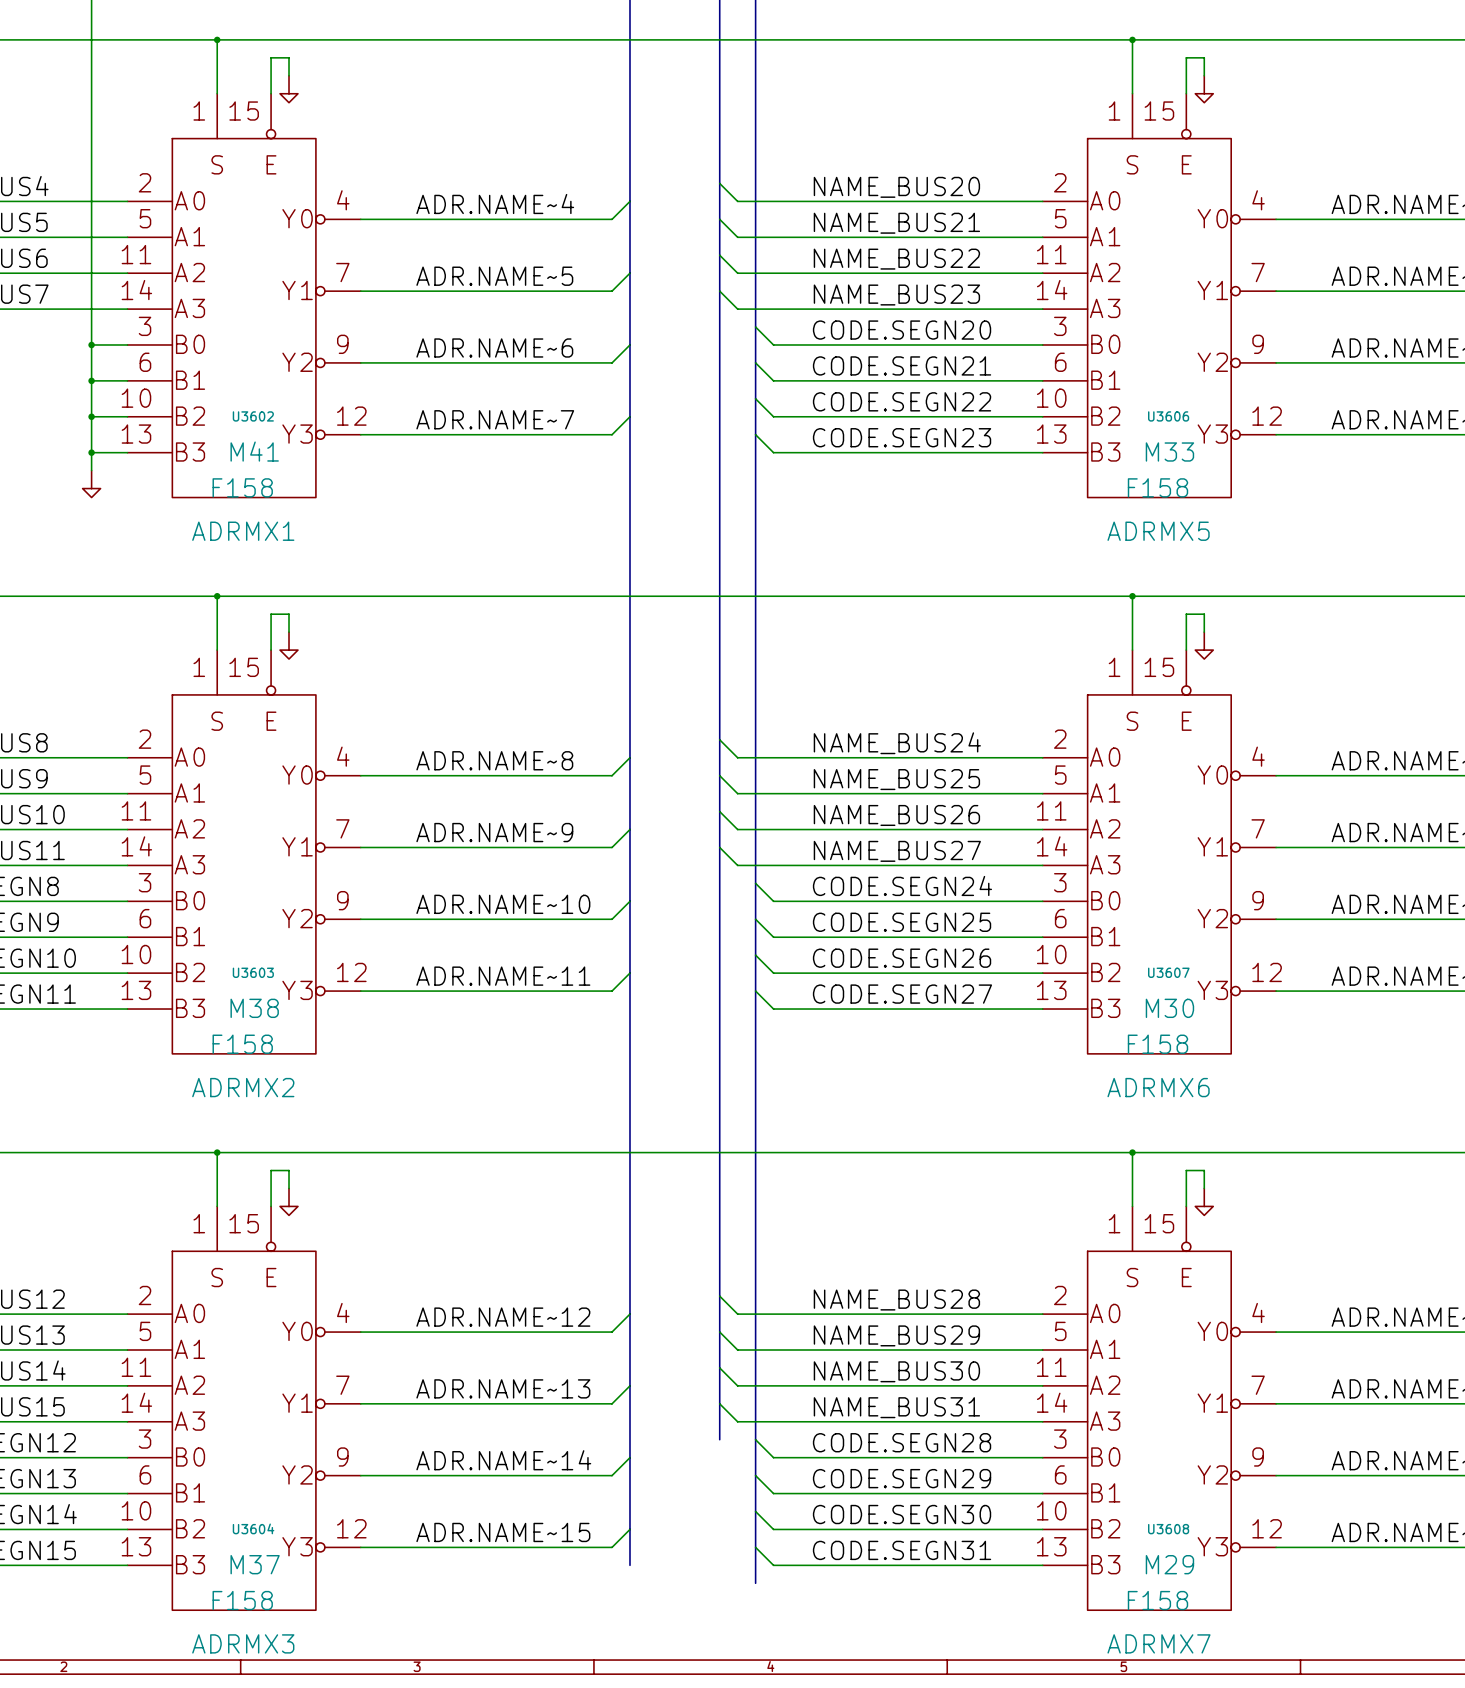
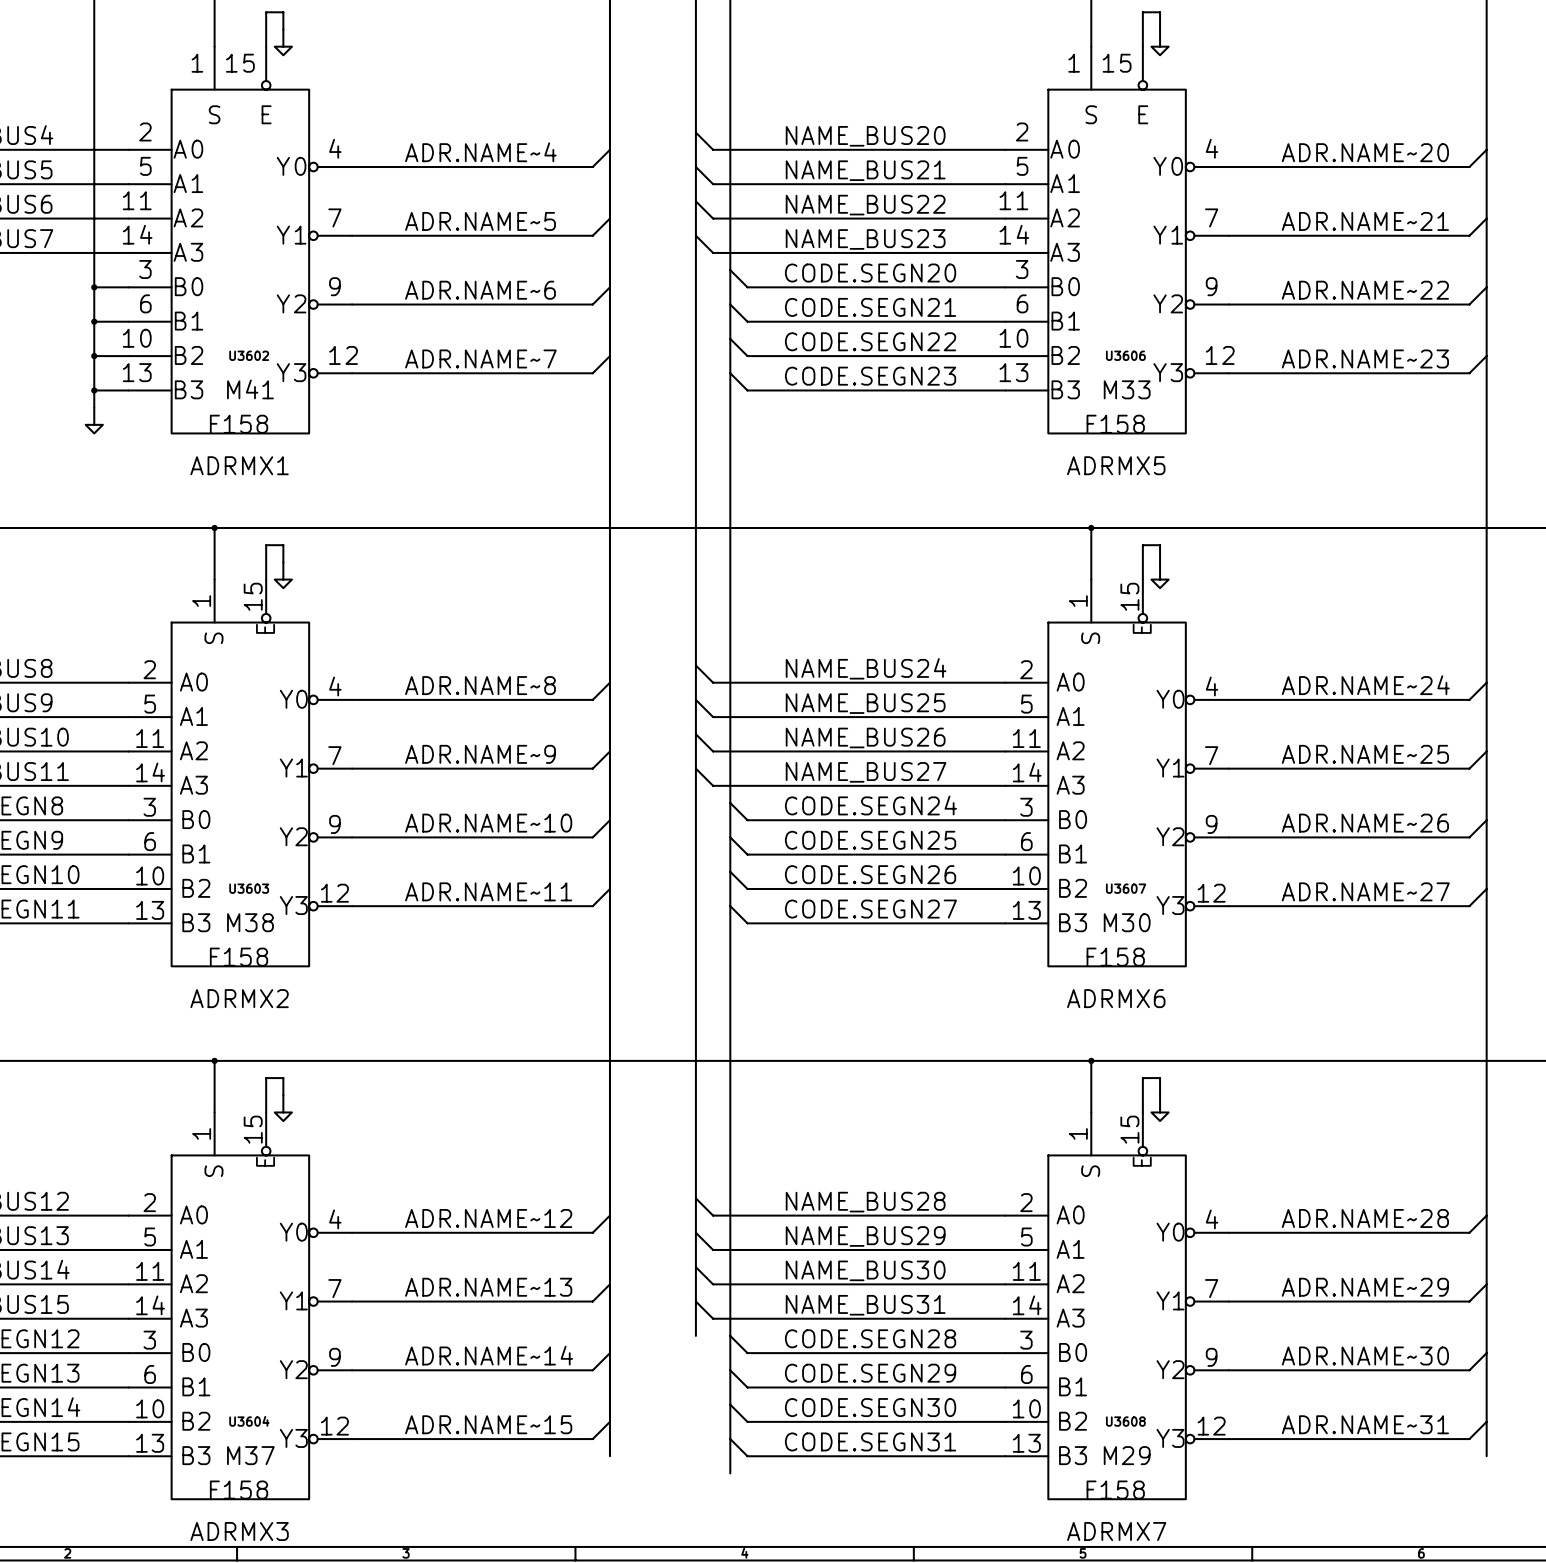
U3603 symbol: [127, 650, 361, 1054] -> [128, 579, 353, 967]
U3607 symbol: [1042, 650, 1277, 1054] -> [1005, 579, 1229, 967]
U3604 symbol: [127, 1206, 361, 1611] -> [128, 1112, 353, 1500]
U3608 symbol: [1042, 1206, 1277, 1611] -> [1005, 1112, 1229, 1500]

